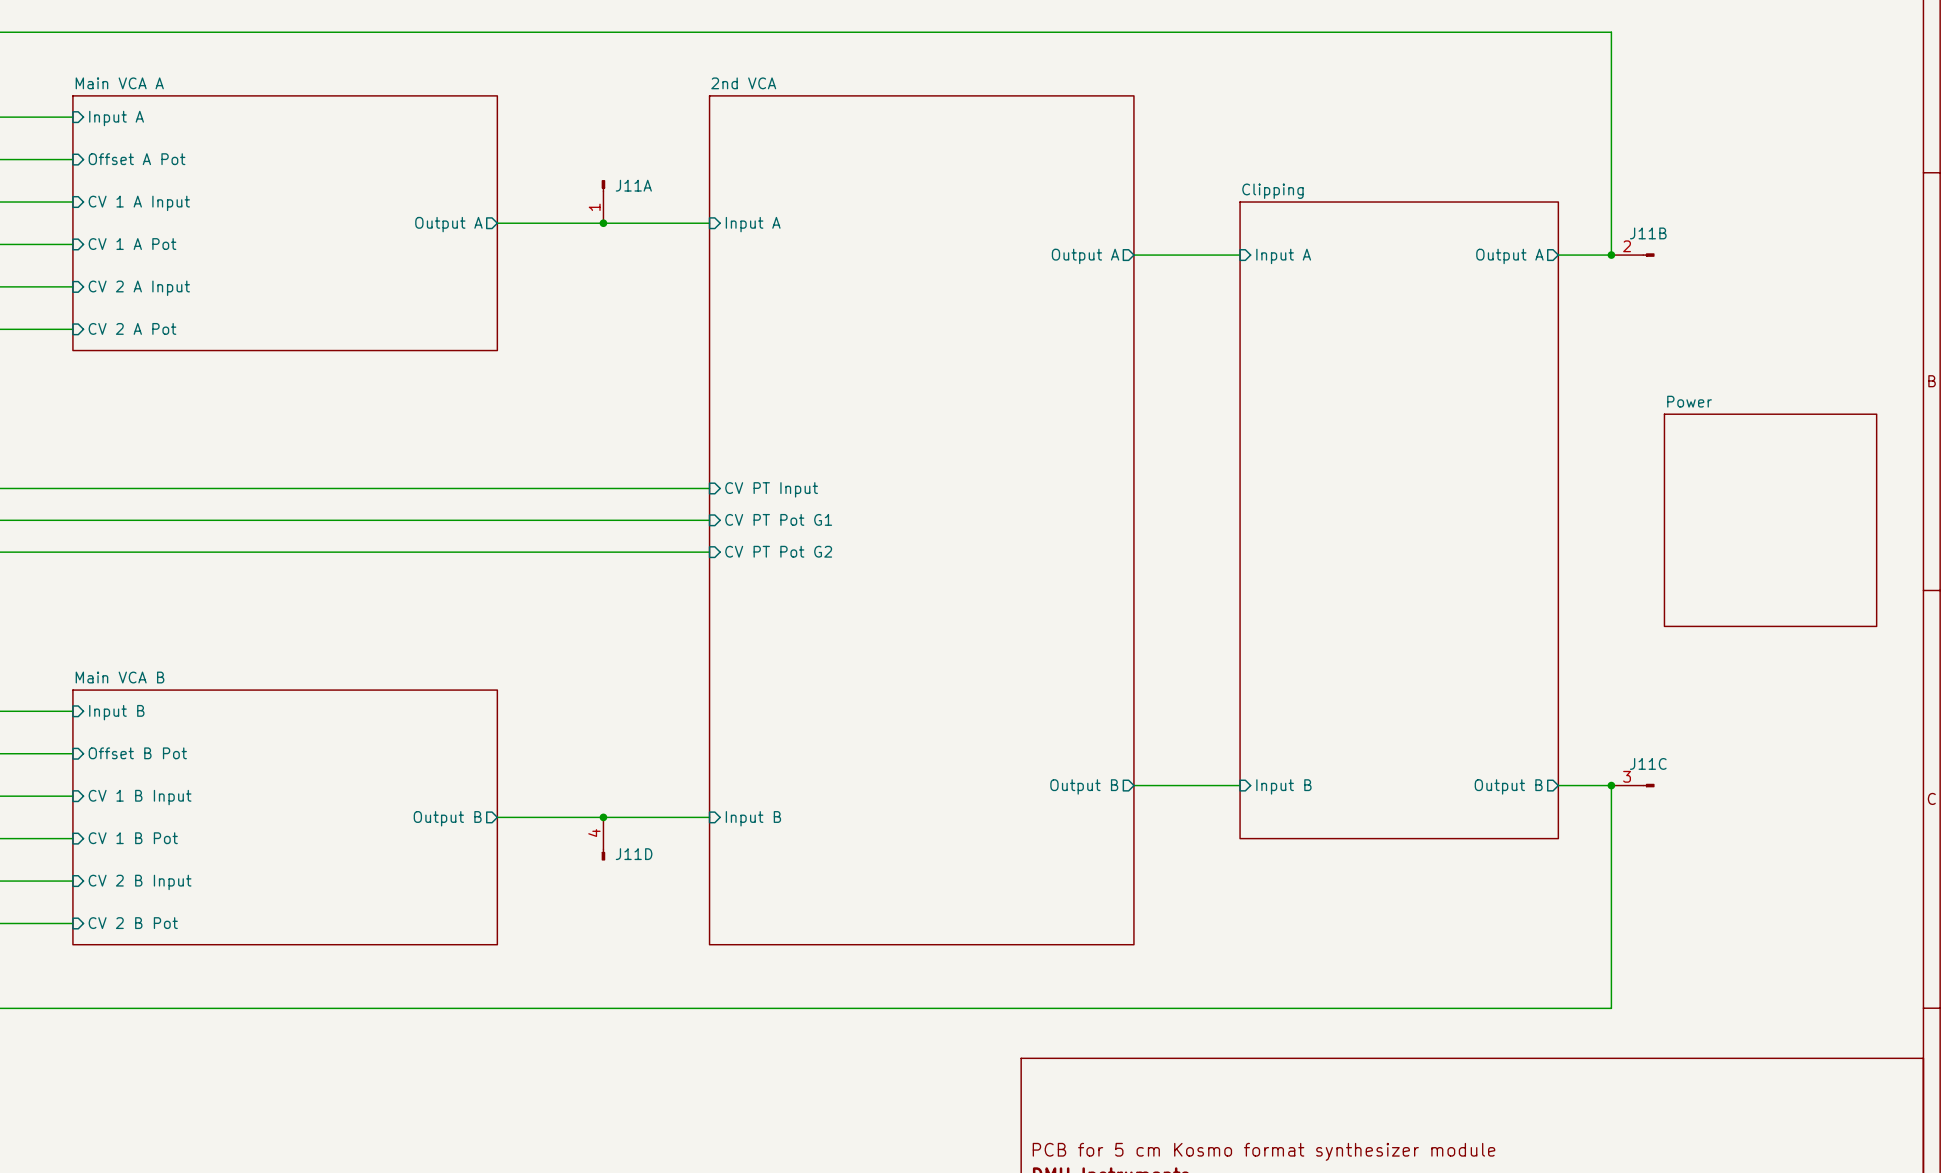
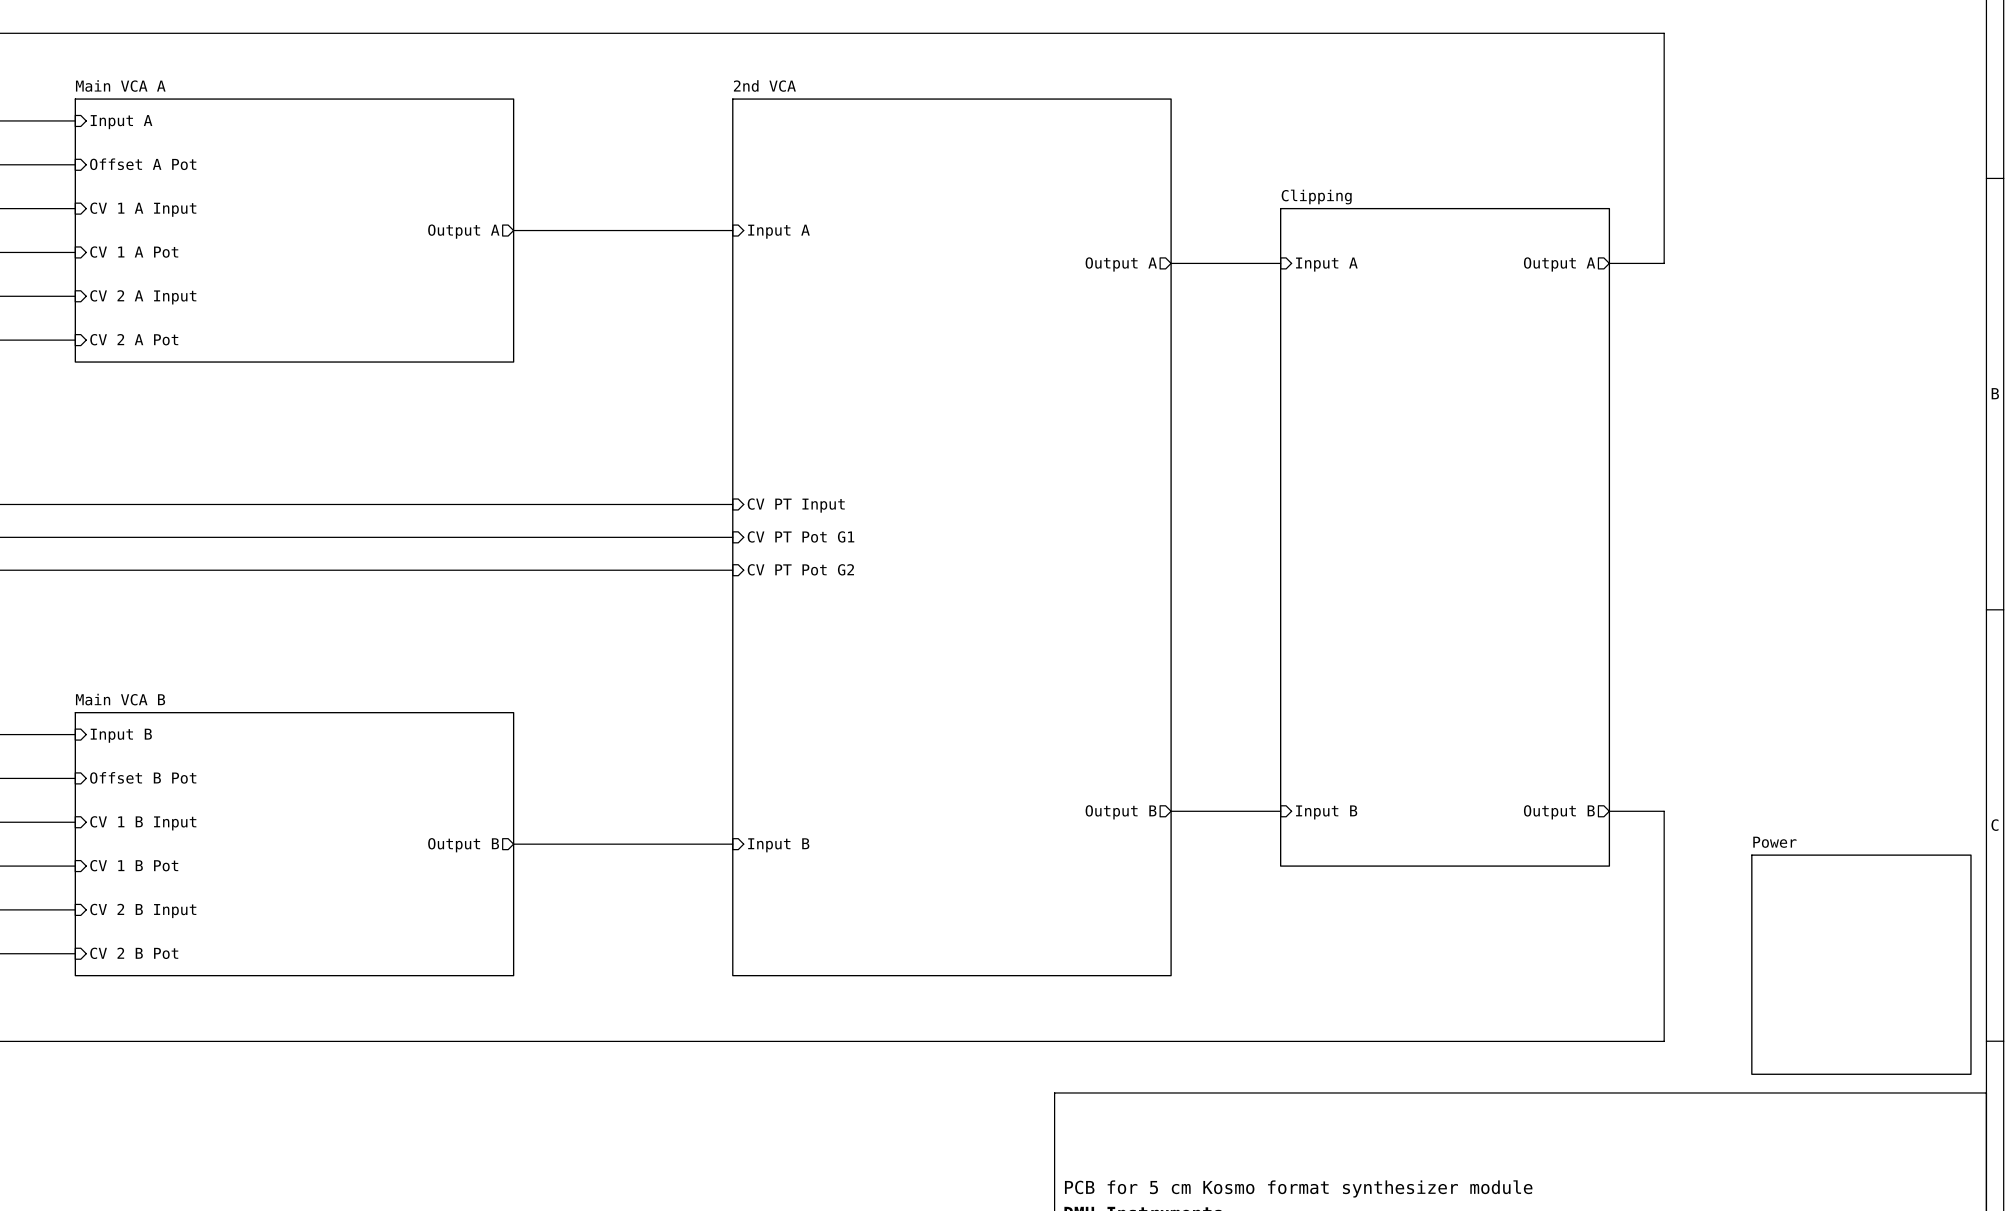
J11A: (603, 201) -> none
junction: (603, 223) -> none
junction: (1611, 255) -> none
J11B: (1632, 255) -> none
sheet Power: (1770, 520) -> none
junction: (1611, 785) -> none
J11C: (1632, 785) -> none
junction: (603, 817) -> none
J11D: (603, 838) -> none
sheet Power: none -> (1861, 964)

